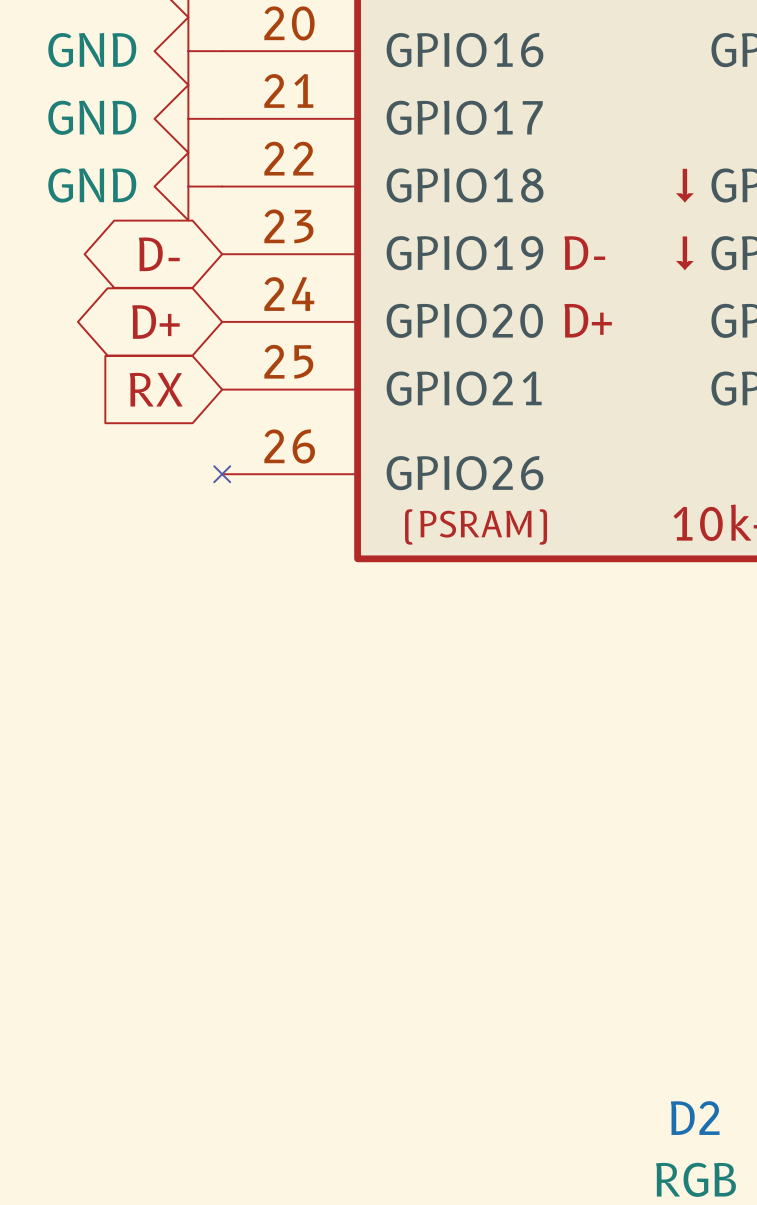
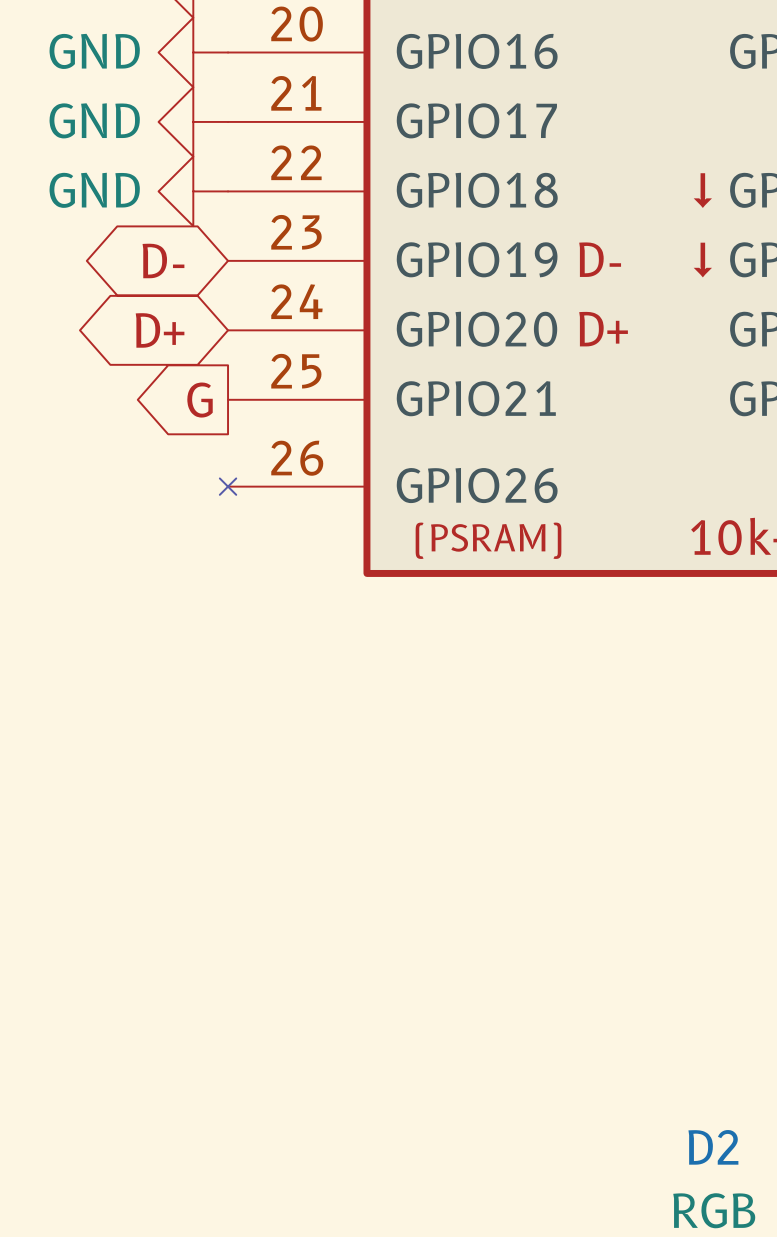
global label shape: input (156, 389) -> output (200, 400)
global label: RX (156, 389) -> G (200, 400)

